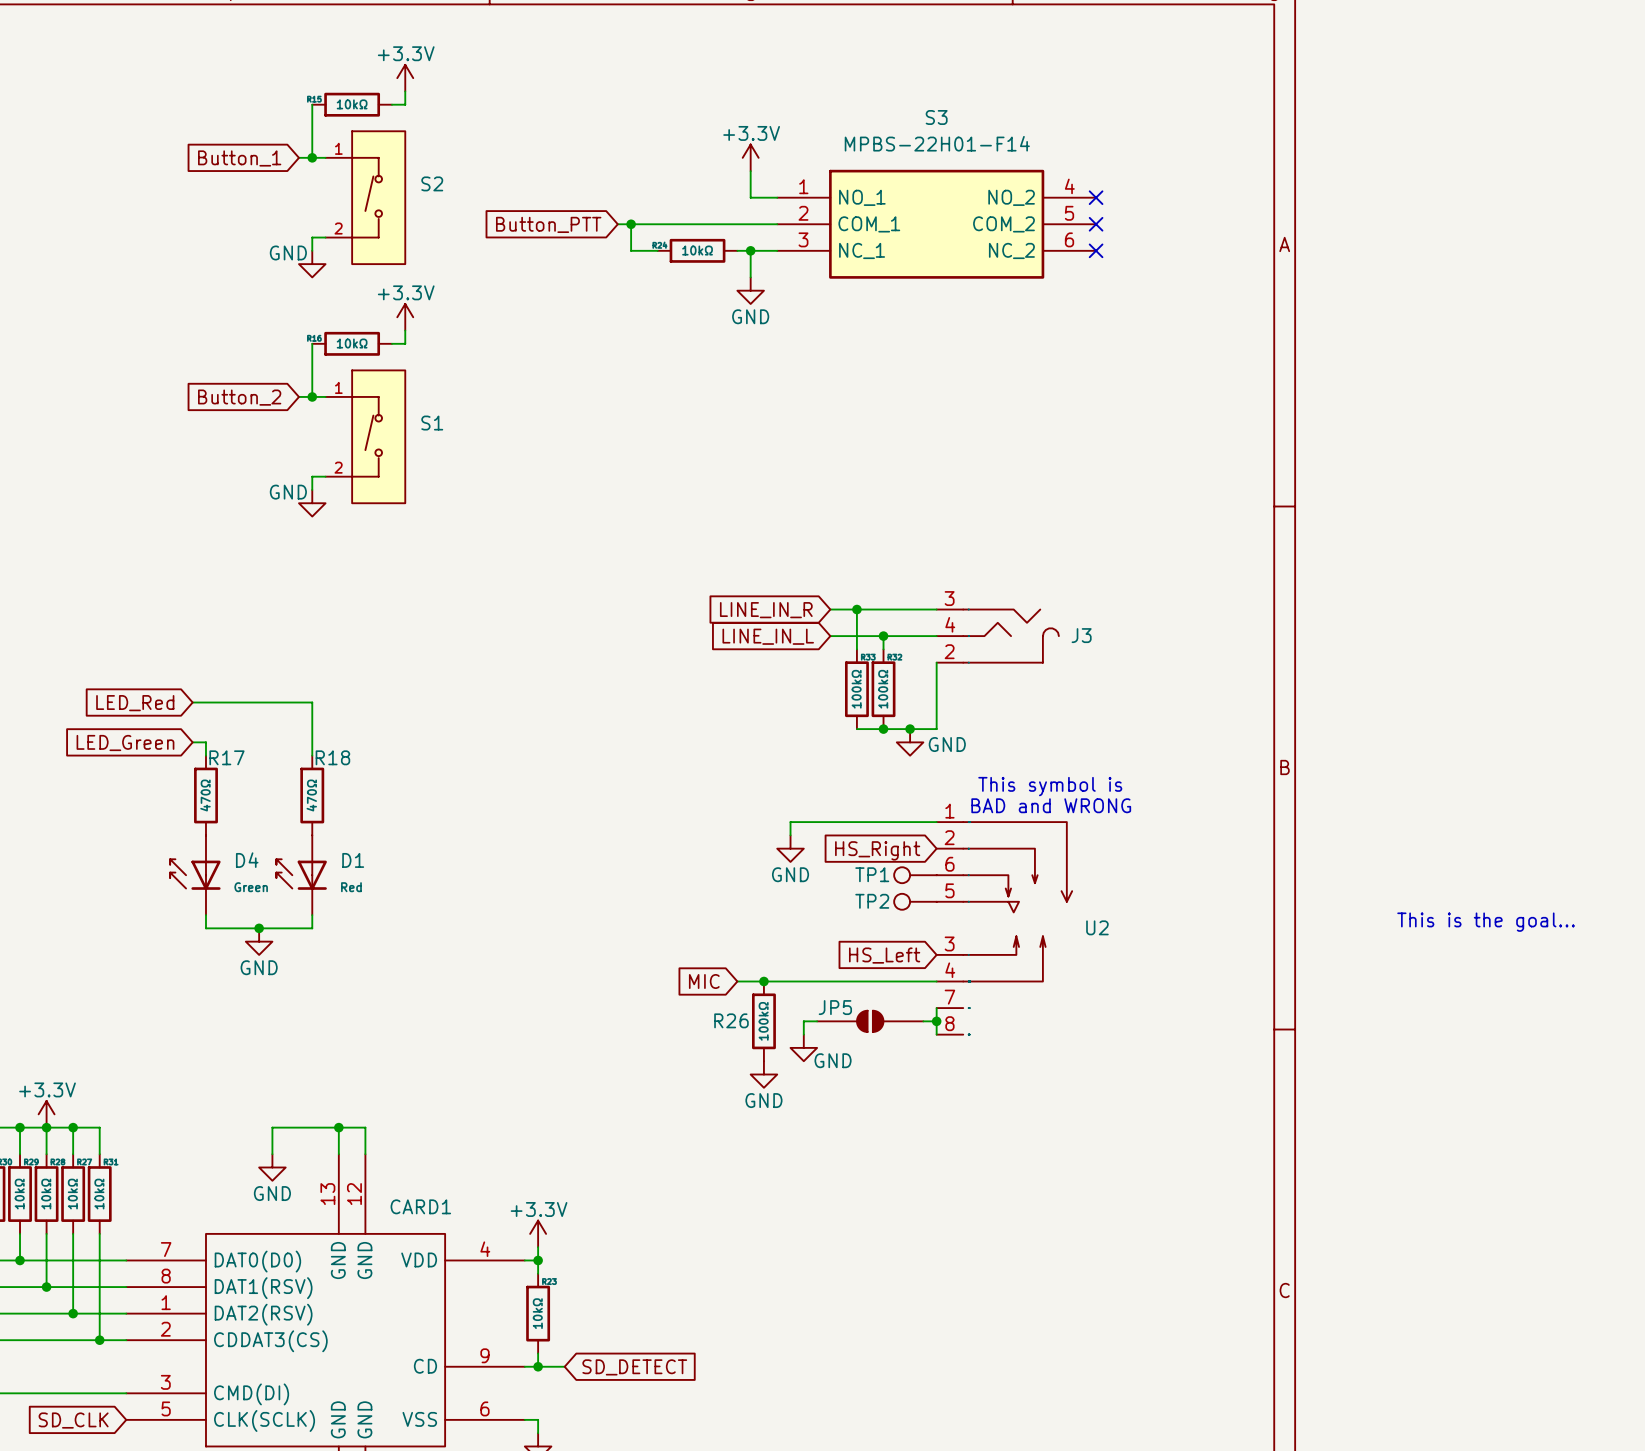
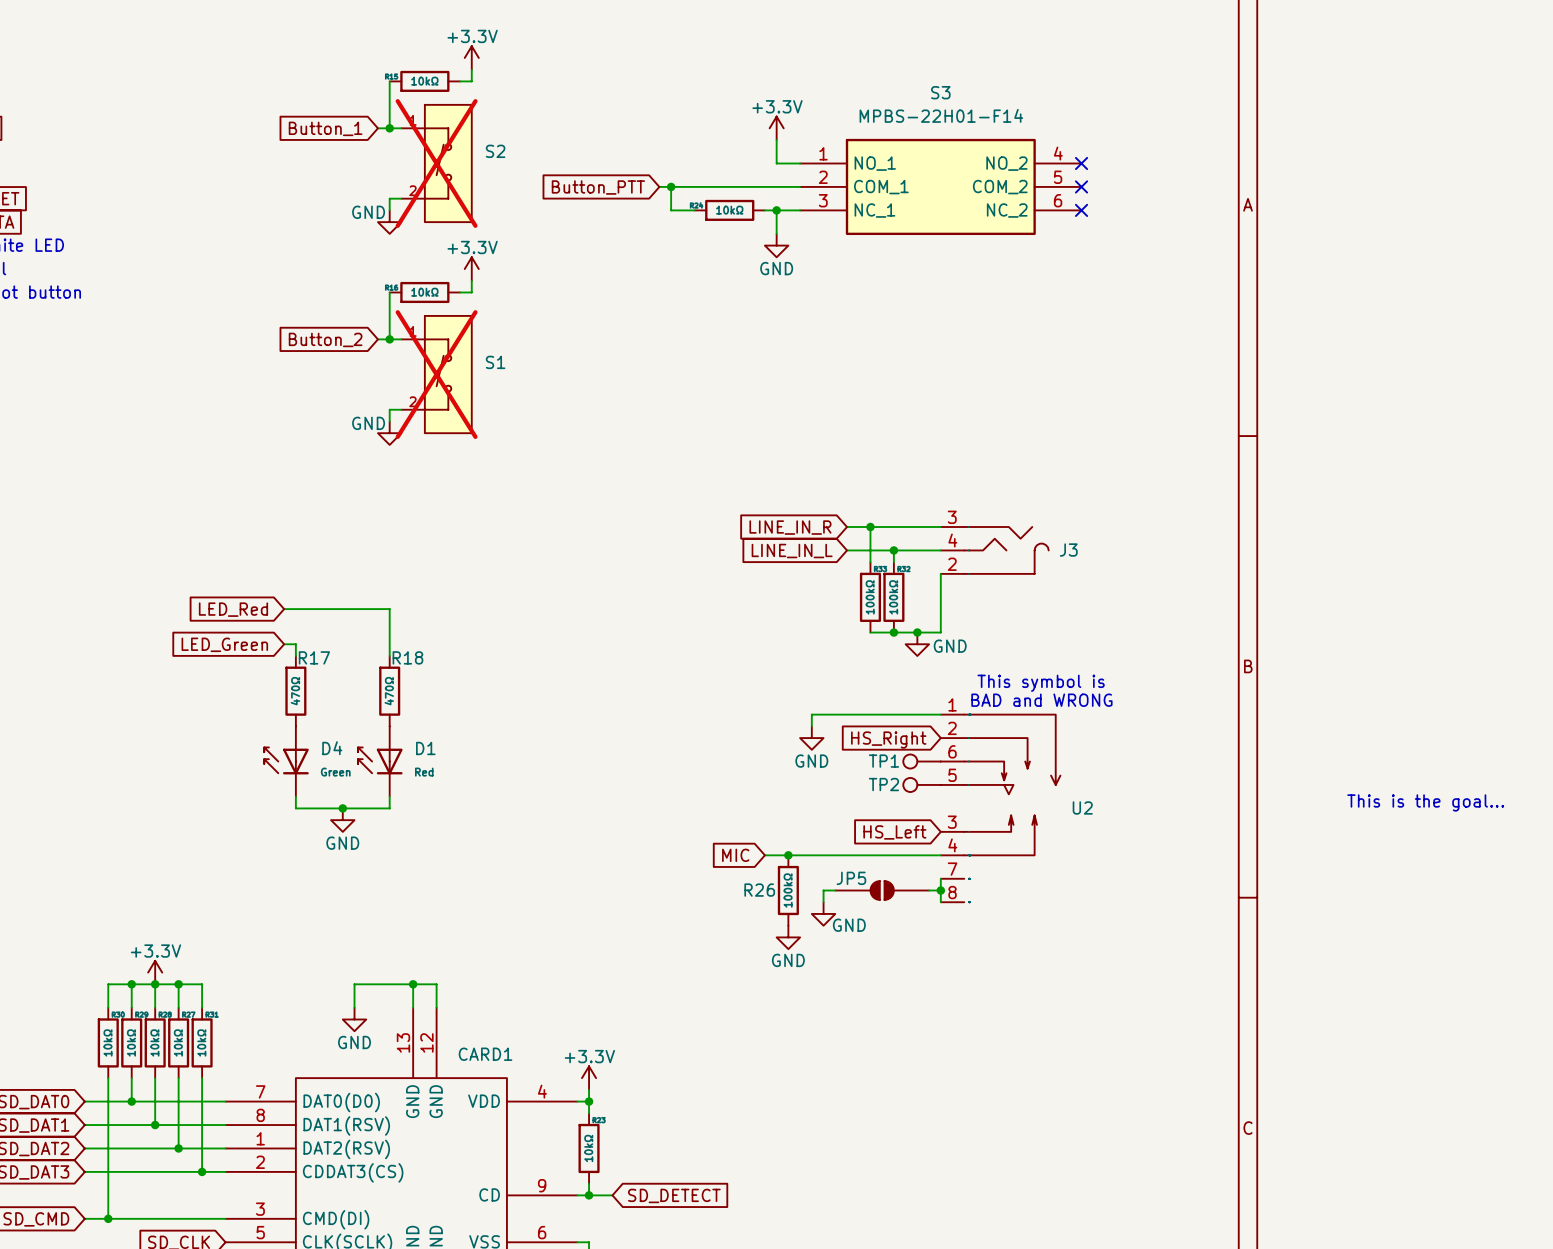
S2 do-not-place cross: none -> (436, 163)
S1 do-not-place cross: none -> (436, 374)

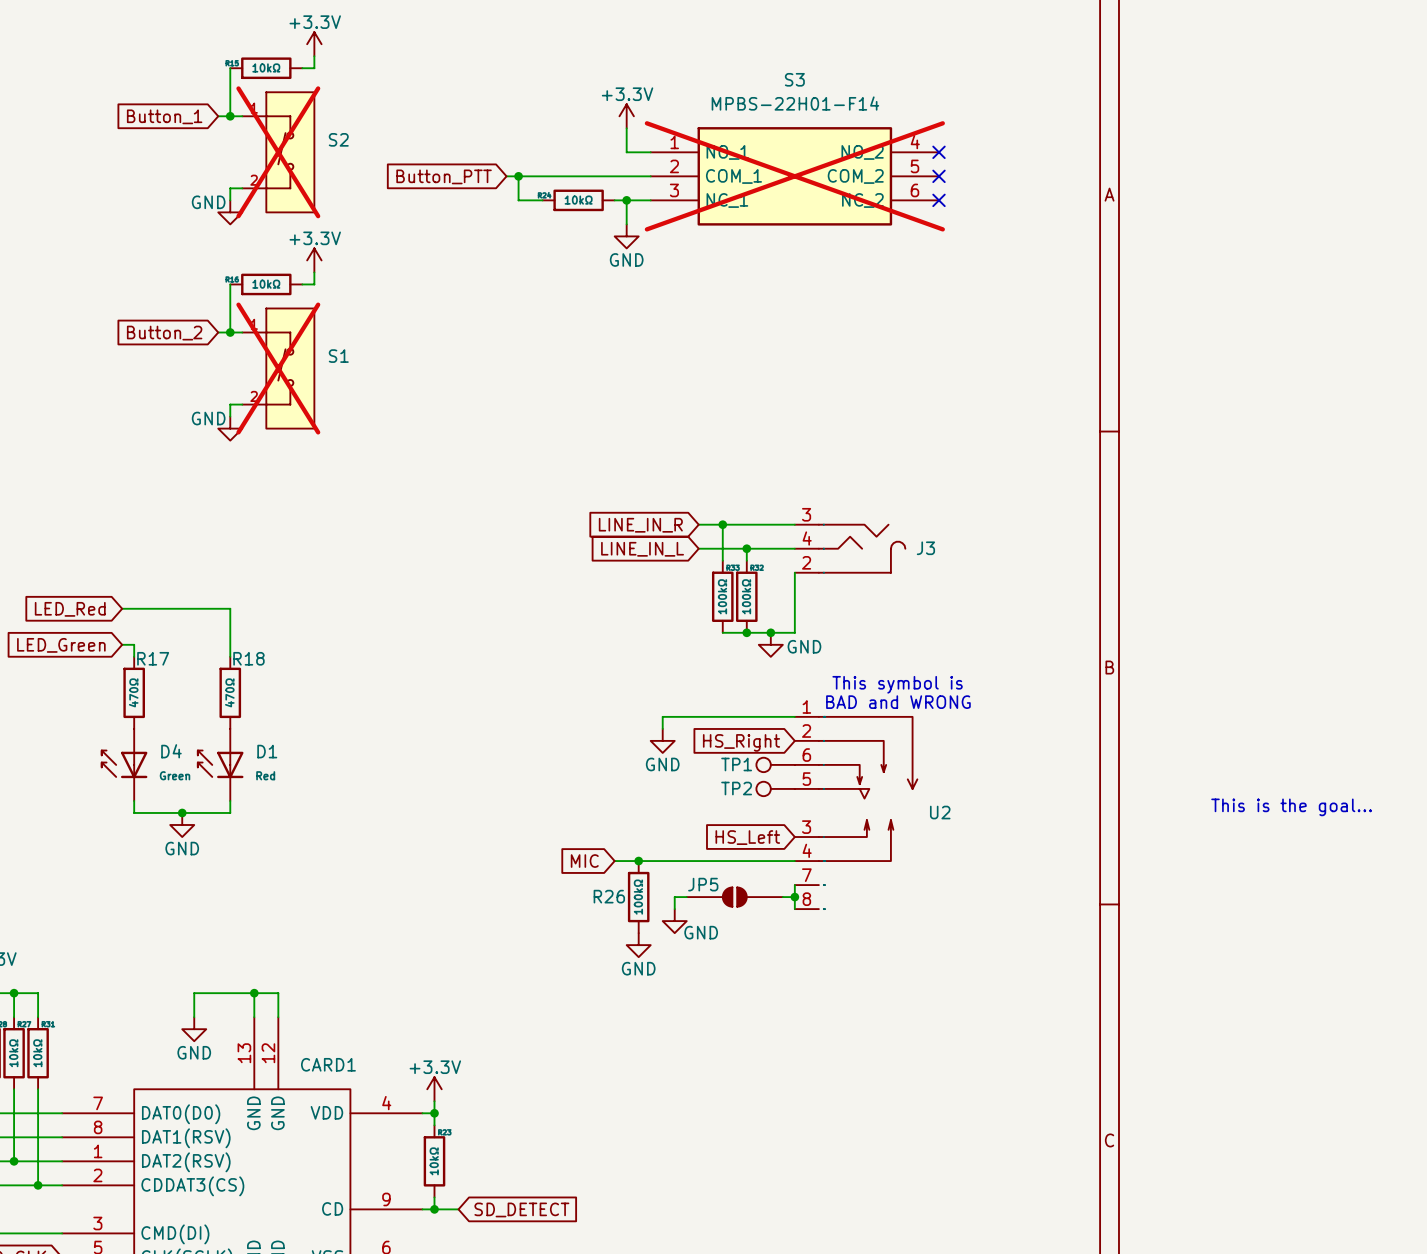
S3 do-not-place cross: none -> (794, 176)

